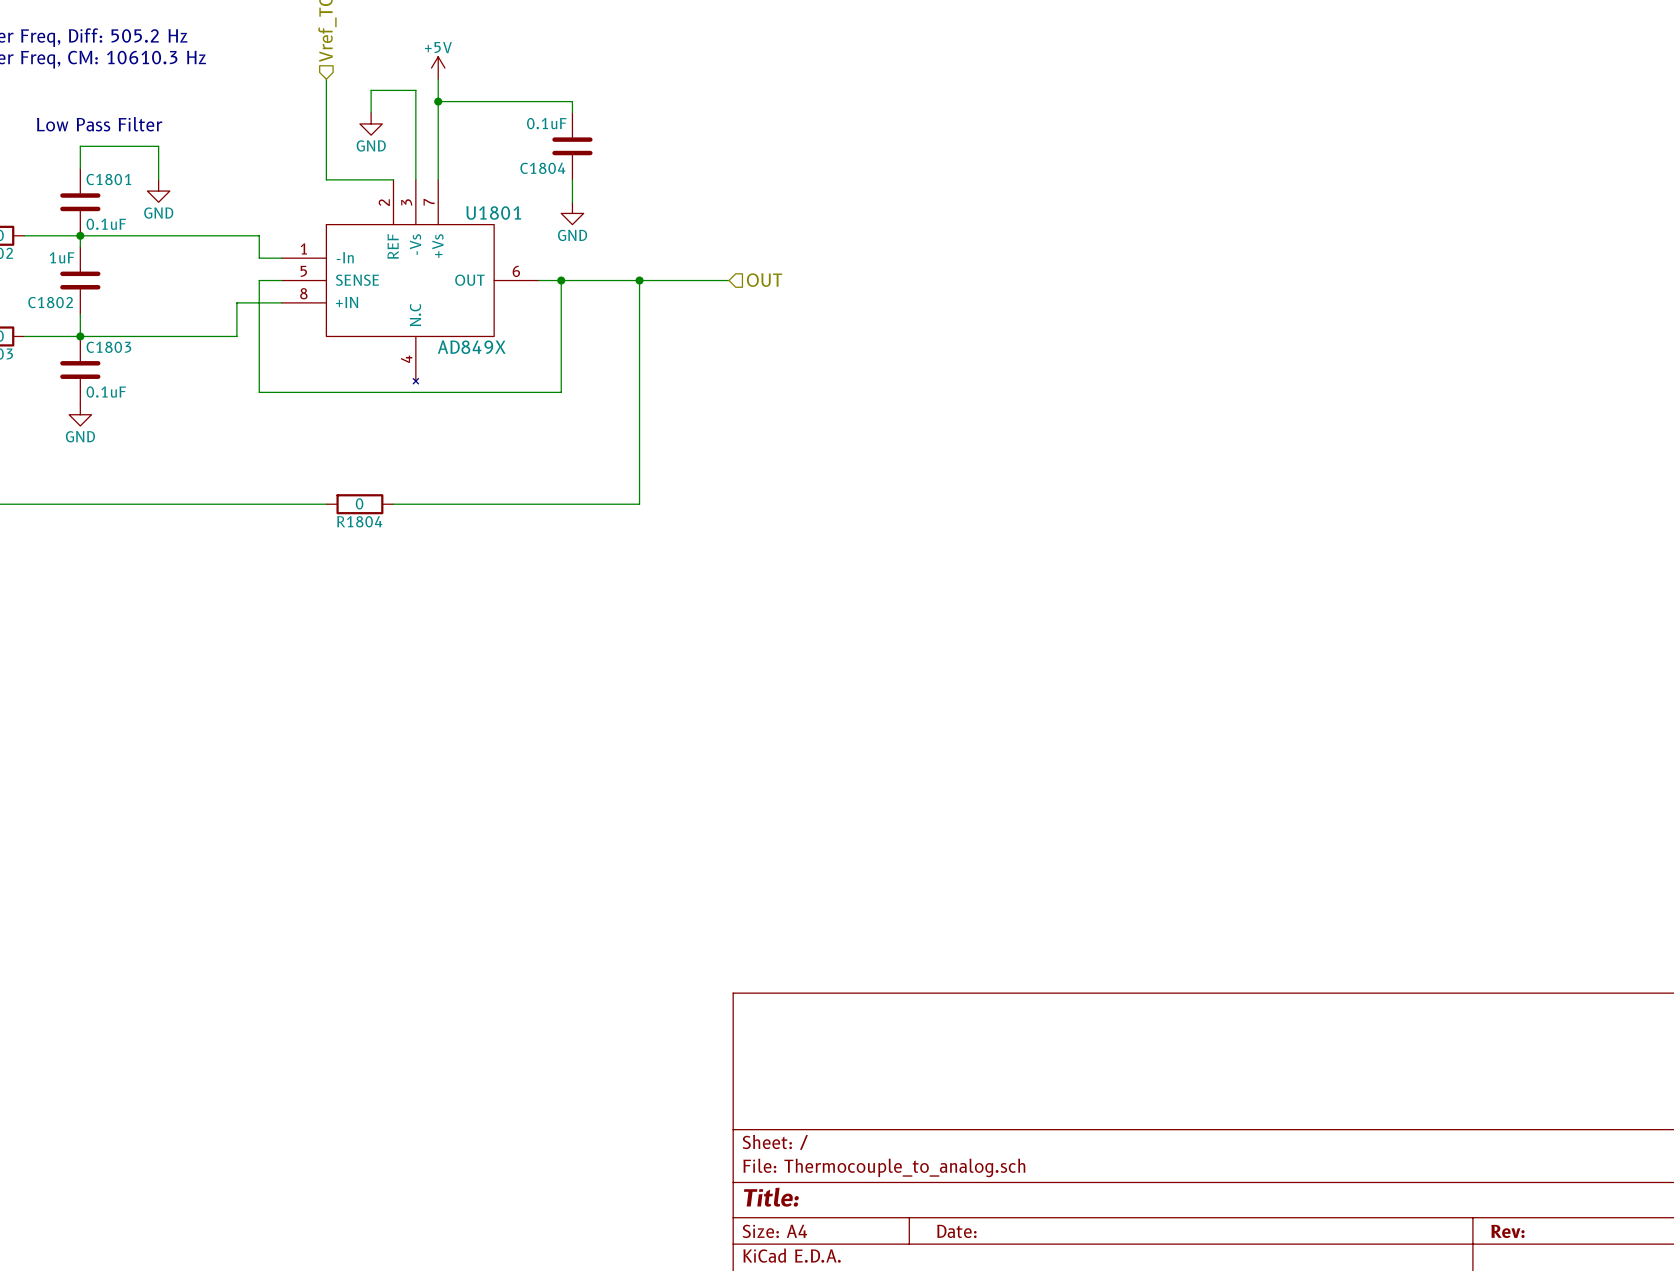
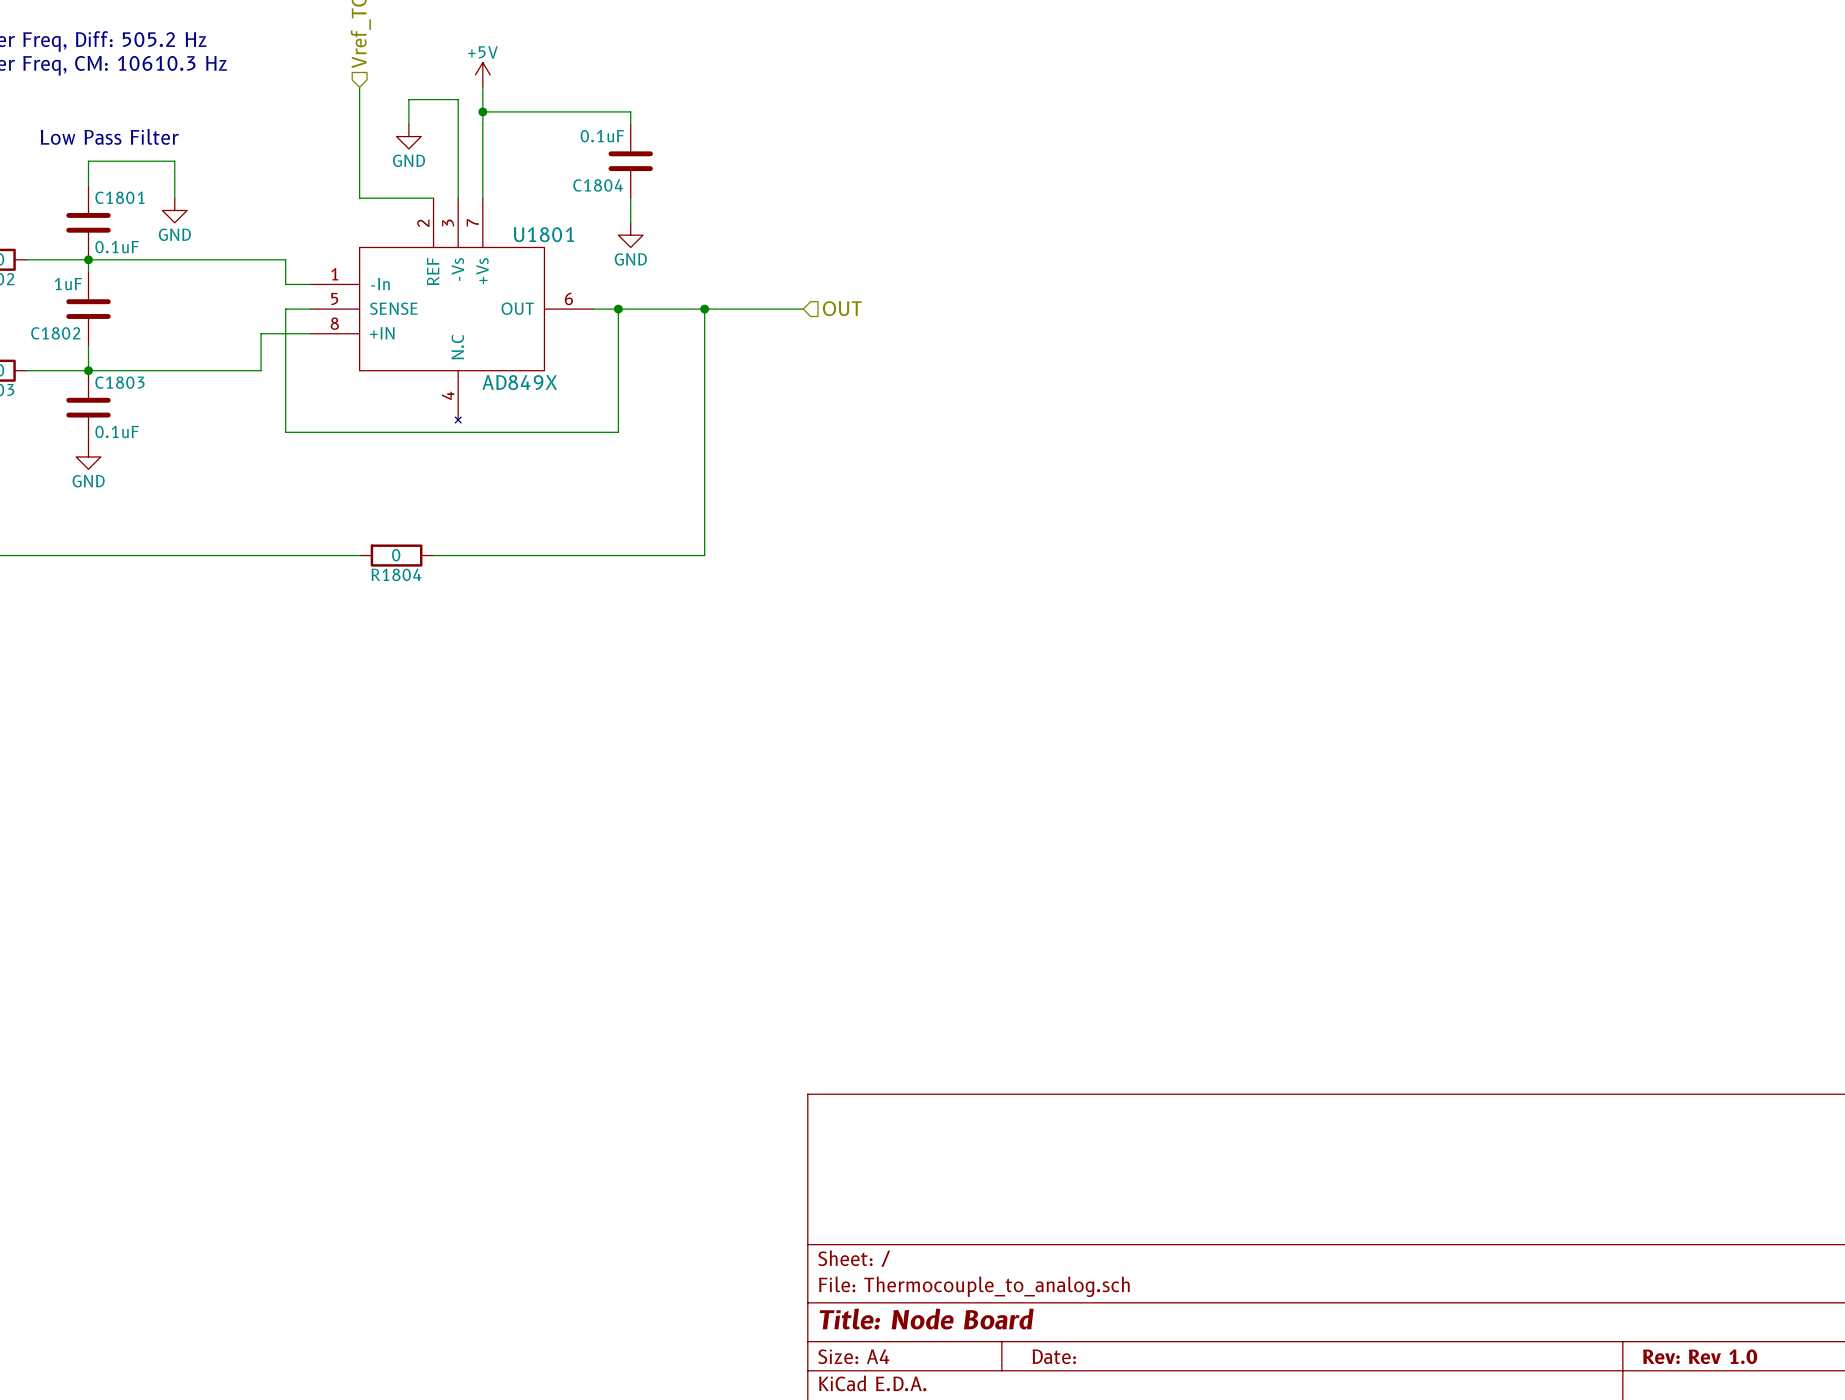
title block: Title: (771, 1197) -> Title: Node Board (926, 1319)
title block: Rev: (1507, 1231) -> Rev: Rev 1.0 (1700, 1356)

